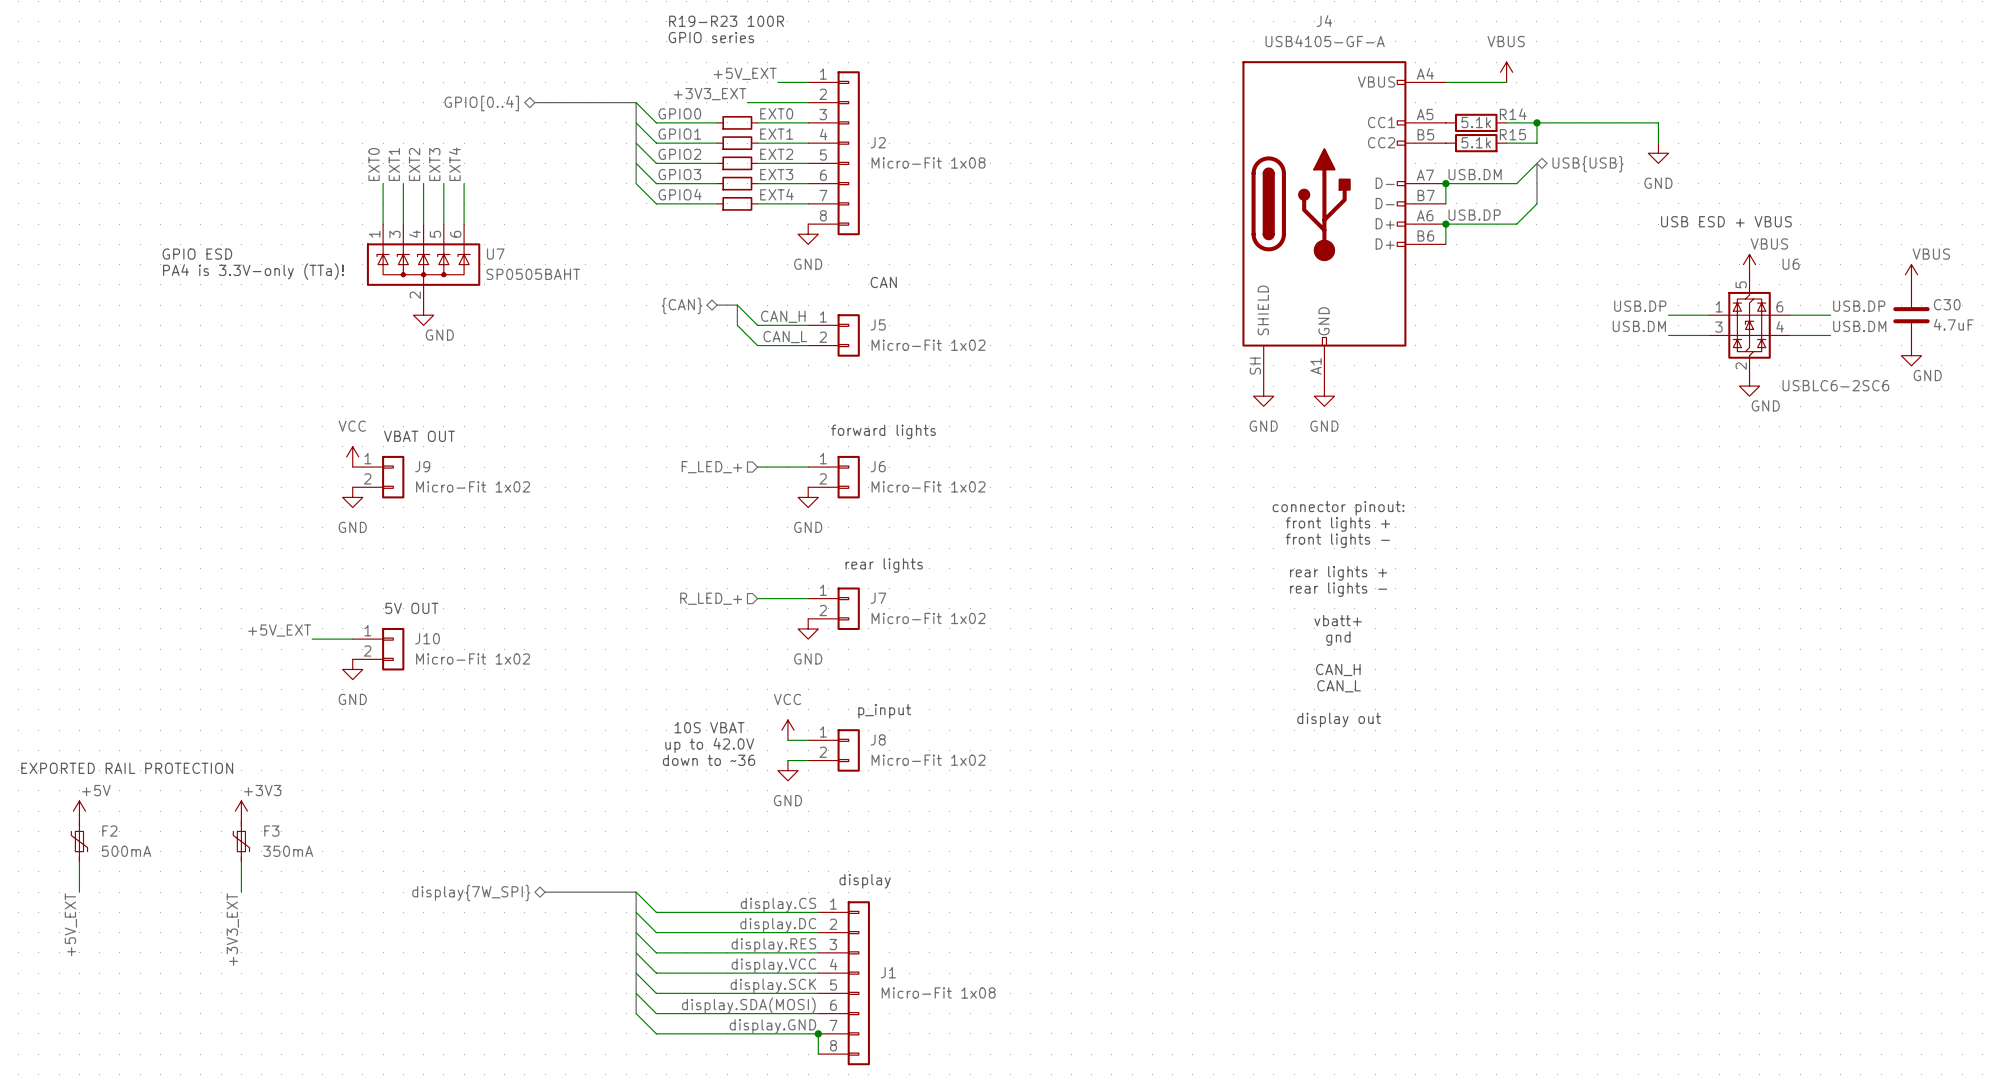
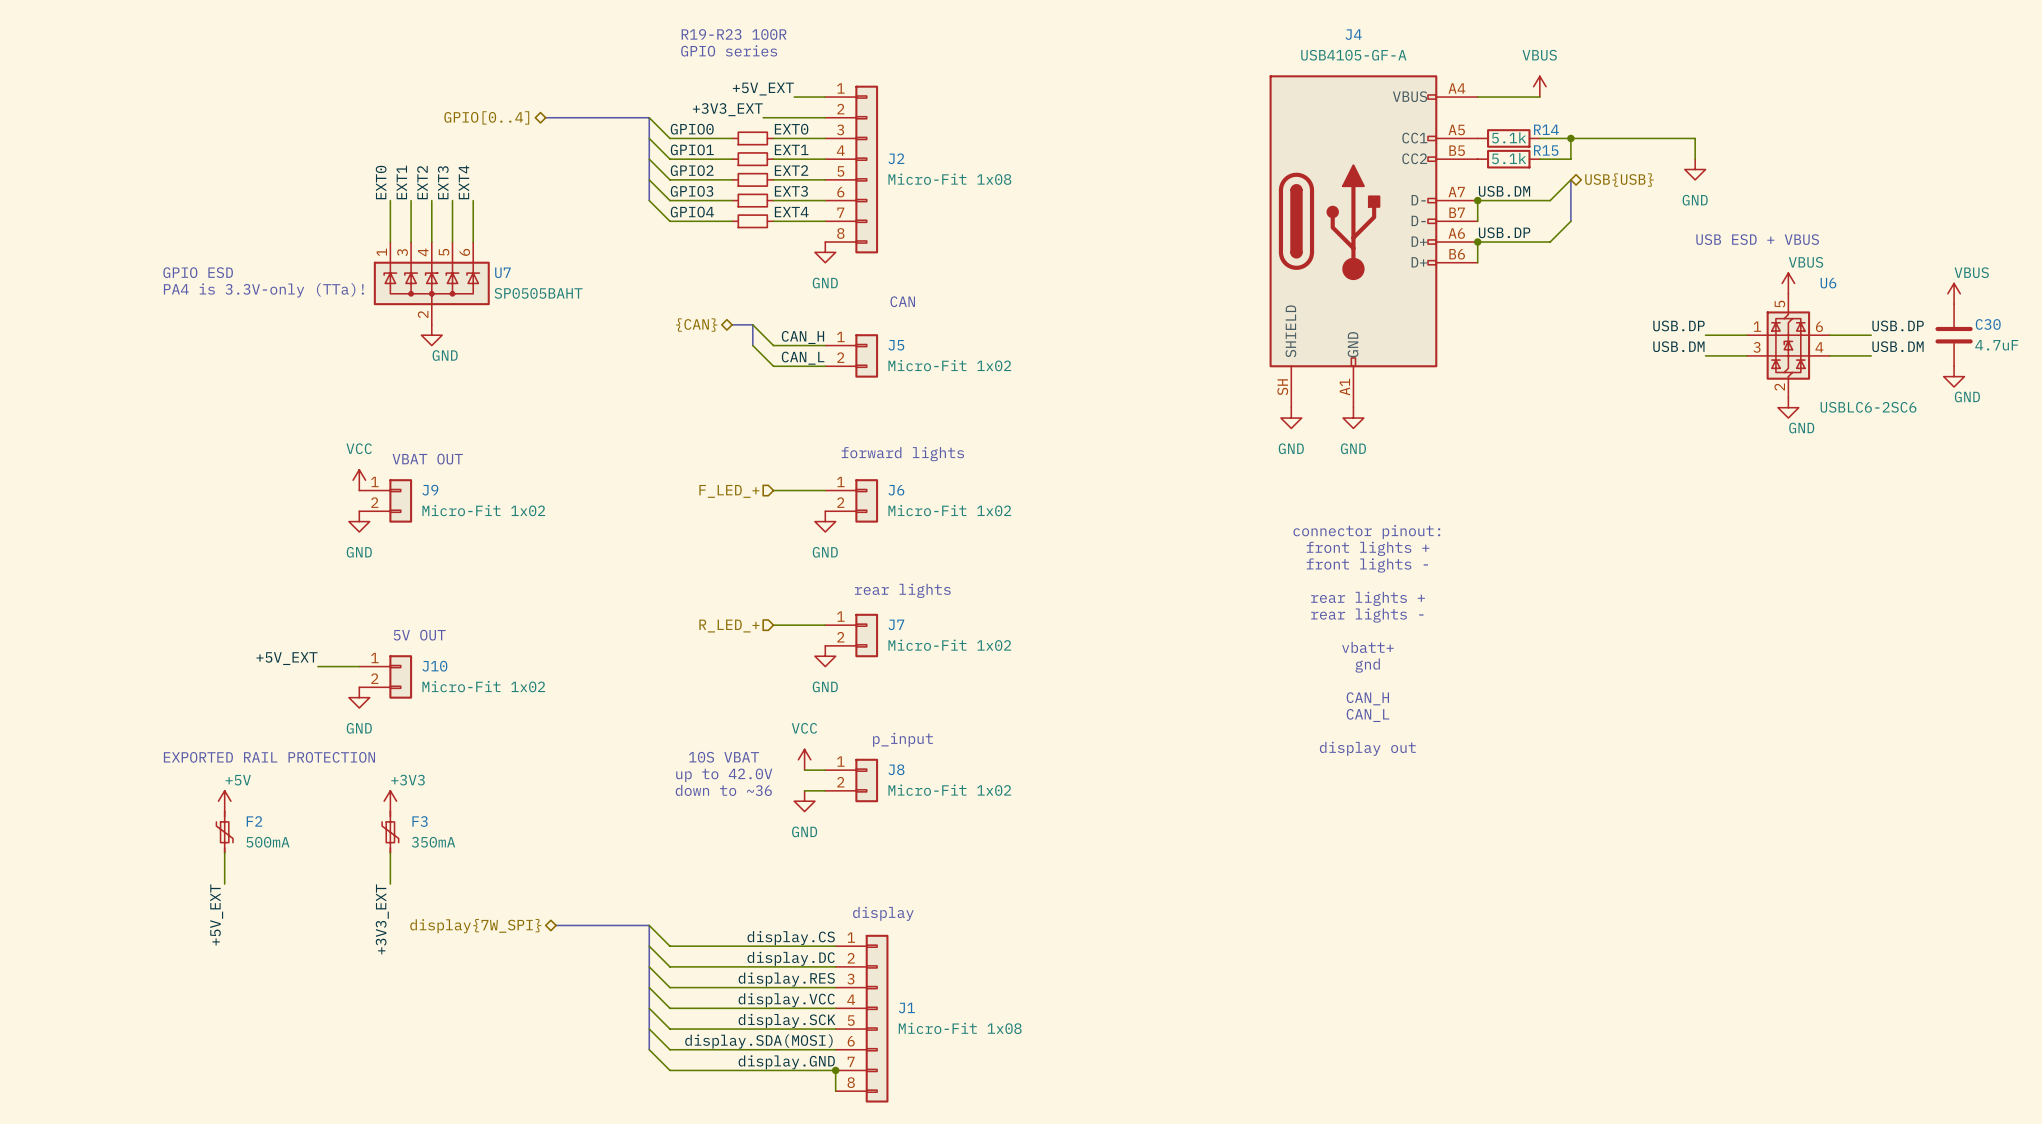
text position: EXPORTED RAIL PROTECTION (127, 768) -> EXPORTED RAIL PROTECTION (269, 757)
power symbol position: +5V (79, 811) -> +5V (224, 801)
power symbol position: +3V3 (241, 811) -> +3V3 (390, 801)
wire: none -> (390, 852) (390, 884)
F2 position: (79, 841) -> (224, 832)
F3 position: (241, 841) -> (390, 832)
wire: (79, 861) (79, 892) -> none
wire: (241, 861) (241, 892) -> (224, 852) (224, 884)
label position: +5V_EXT (70, 924) -> +5V_EXT (216, 914)
label position: +3V3_EXT (232, 929) -> +3V3_EXT (382, 919)

